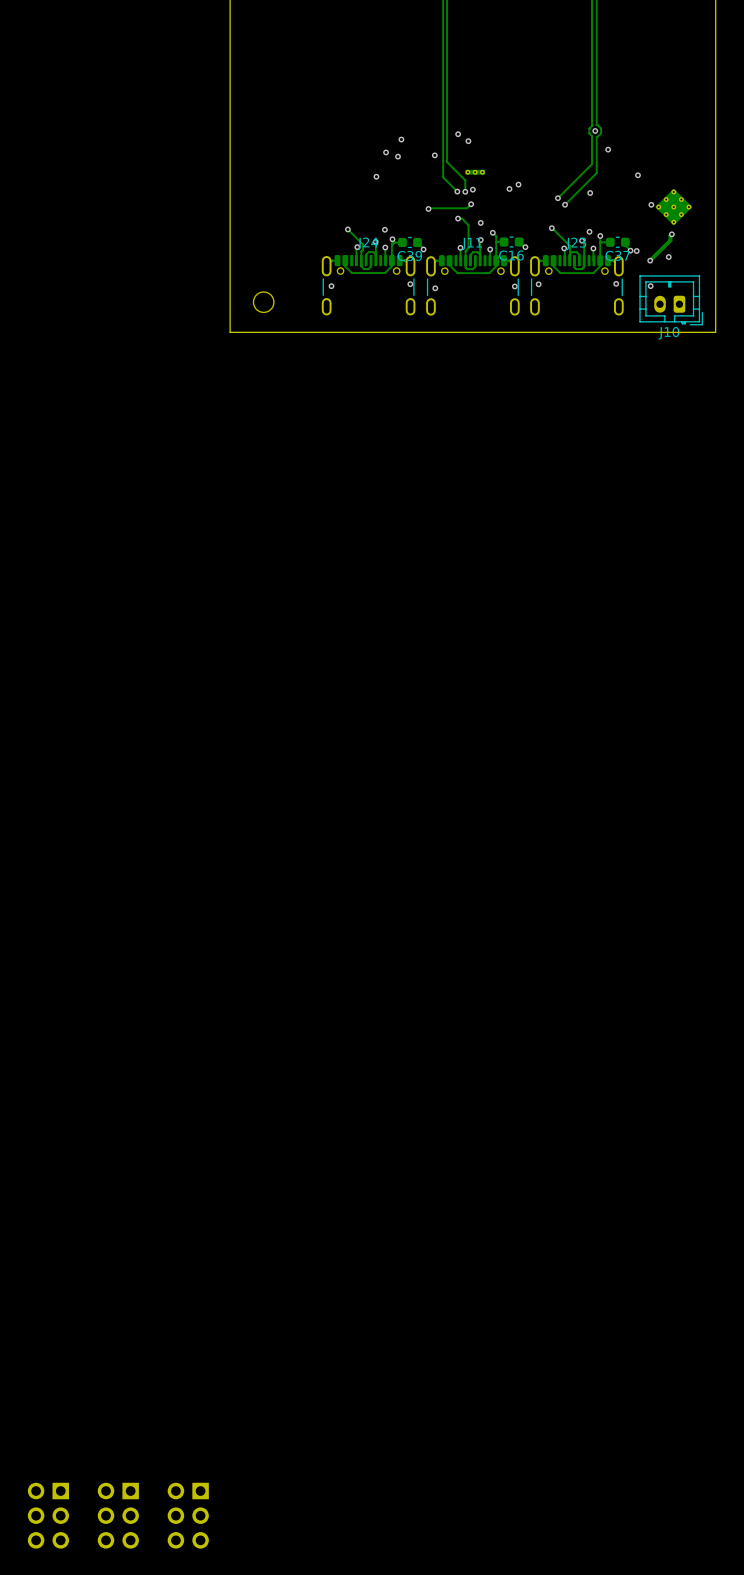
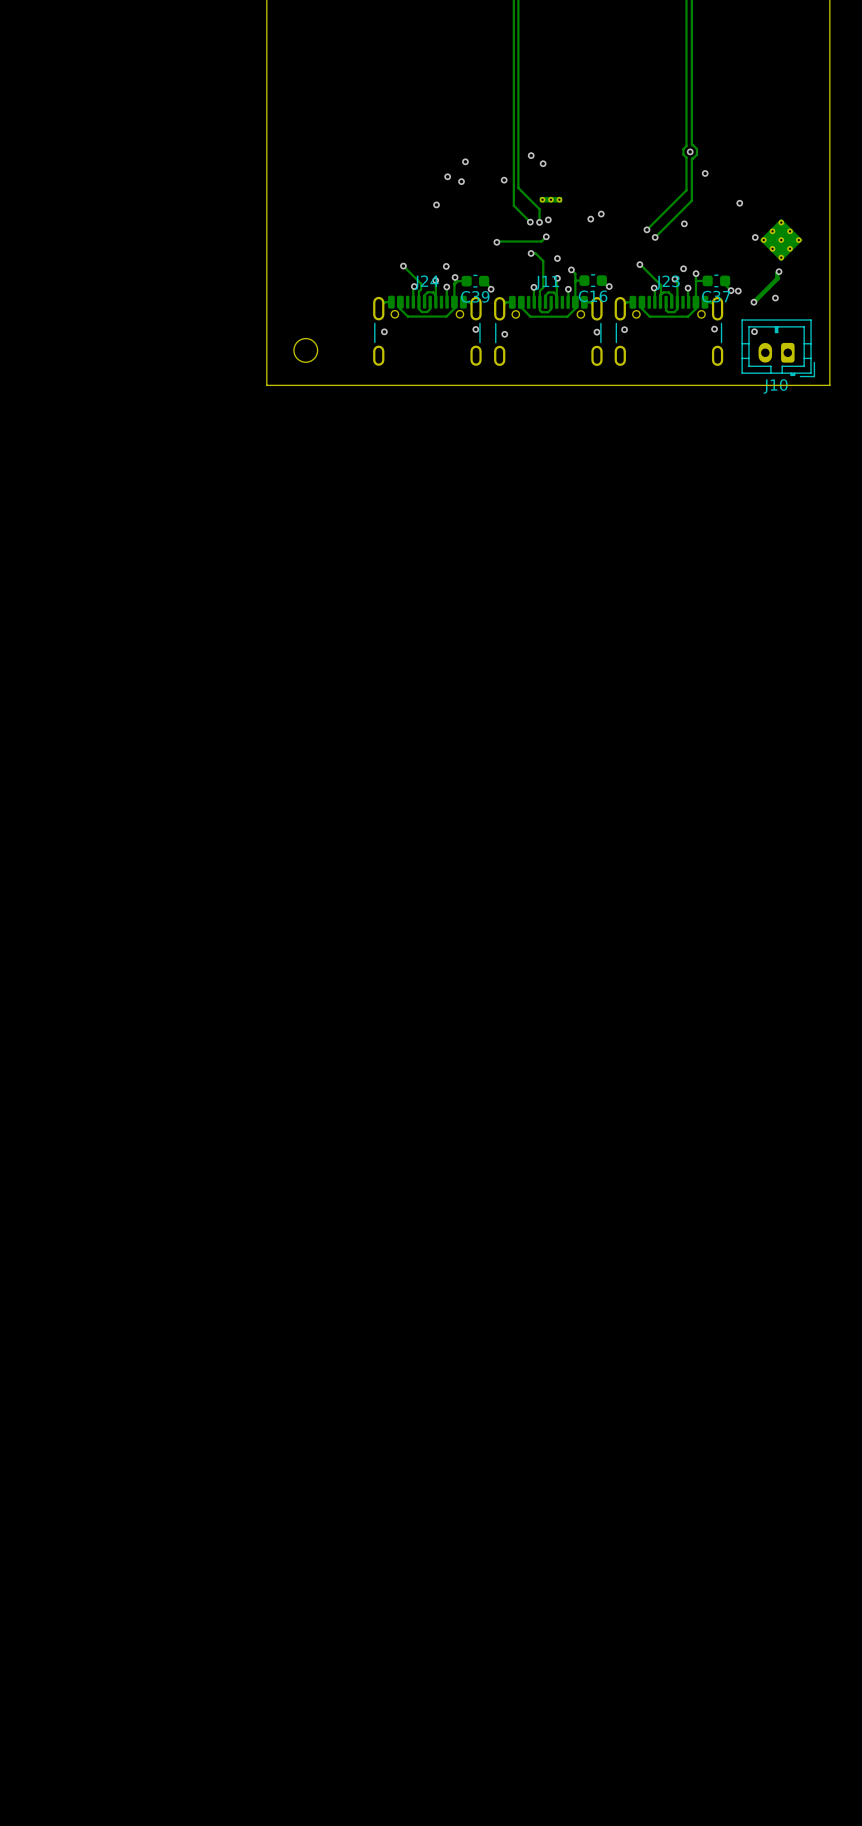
part: (48, 1515) -> none
part: (118, 1515) -> none
part: (188, 1515) -> none

